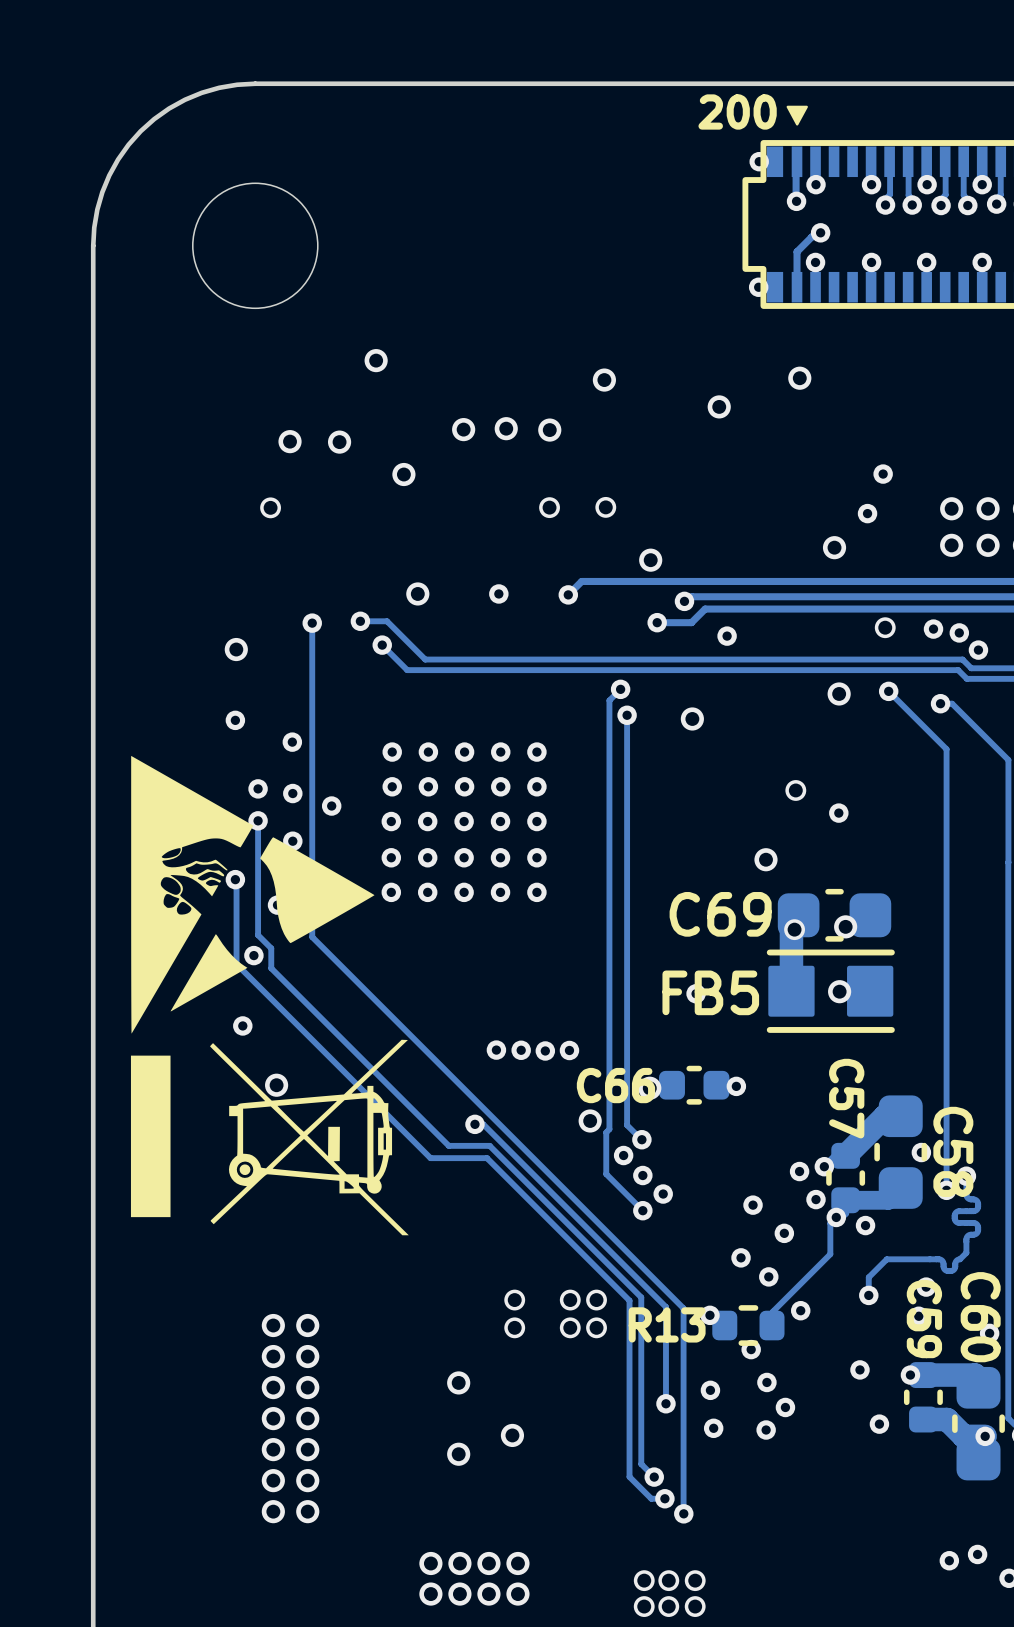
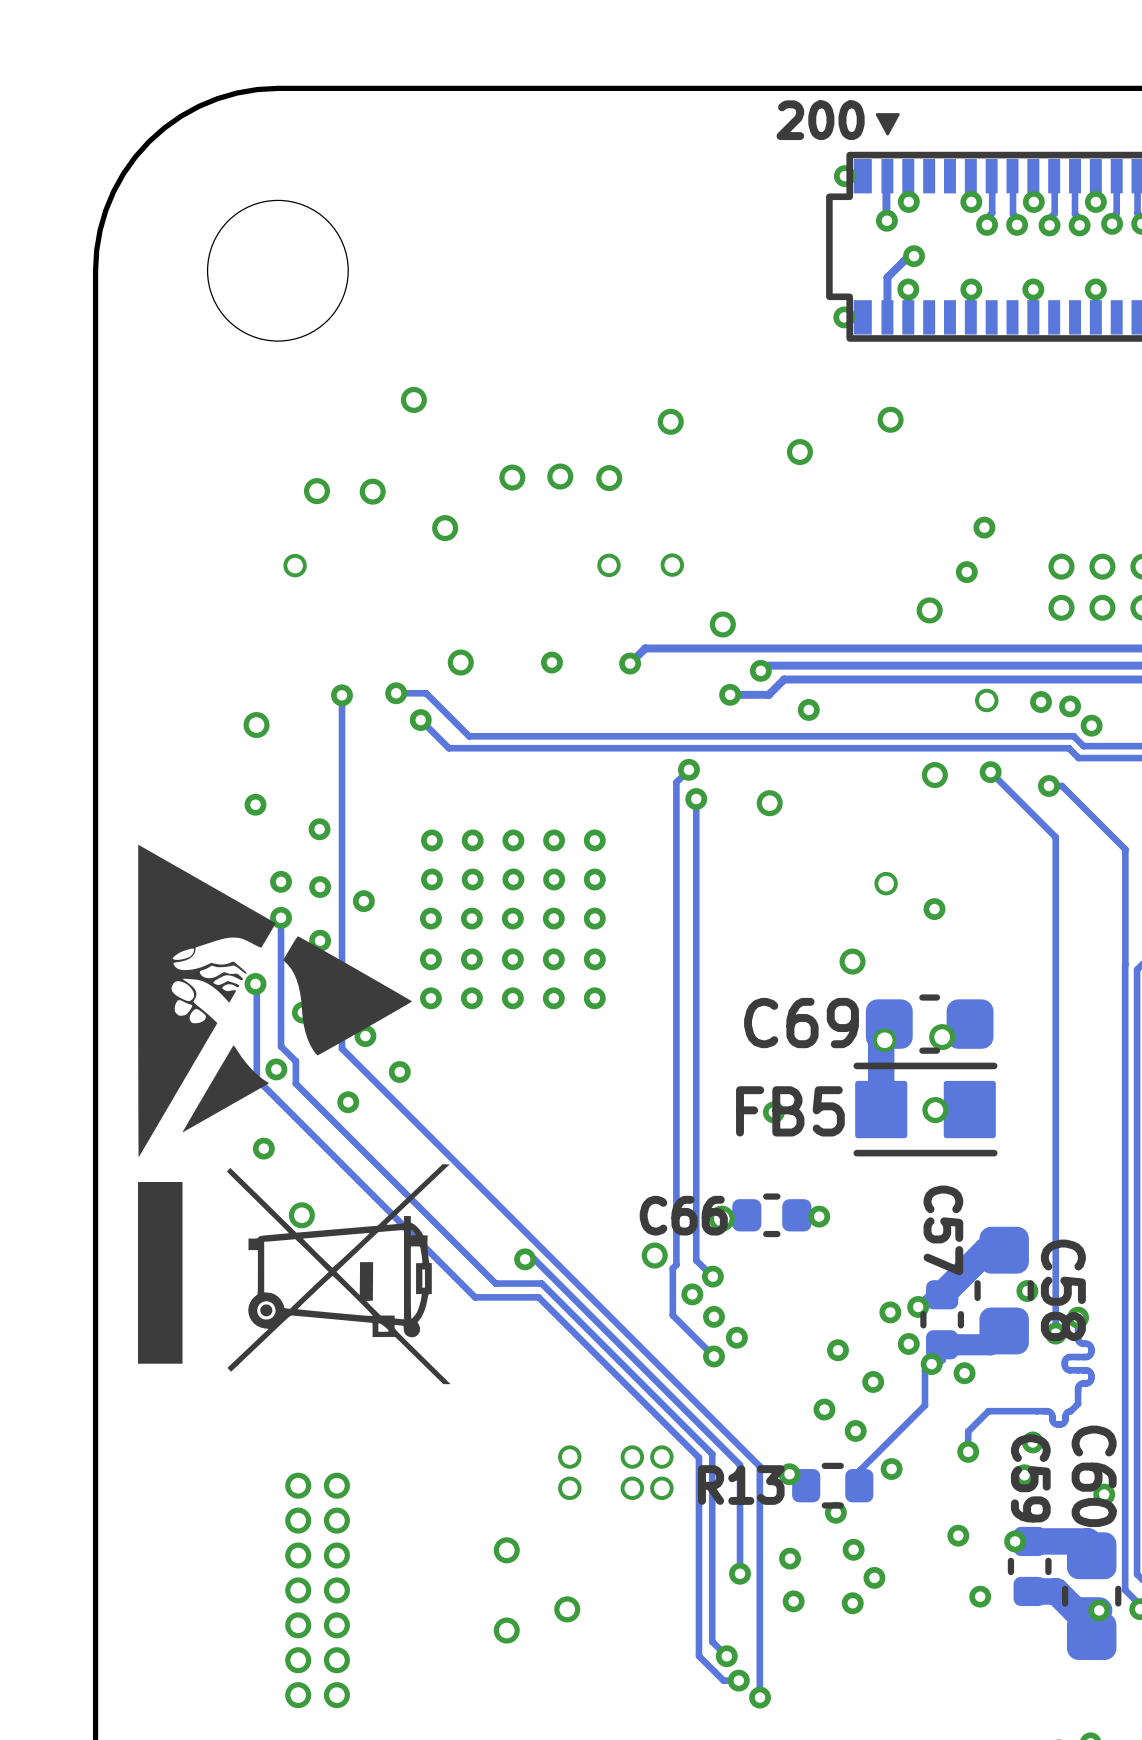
via: none -> (365, 1036)
via: none -> (399, 1072)
via: none -> (348, 1102)
via: (496, 1050) -> none
via: (521, 1050) -> none
via: (545, 1050) -> none
via: (569, 1050) -> none

